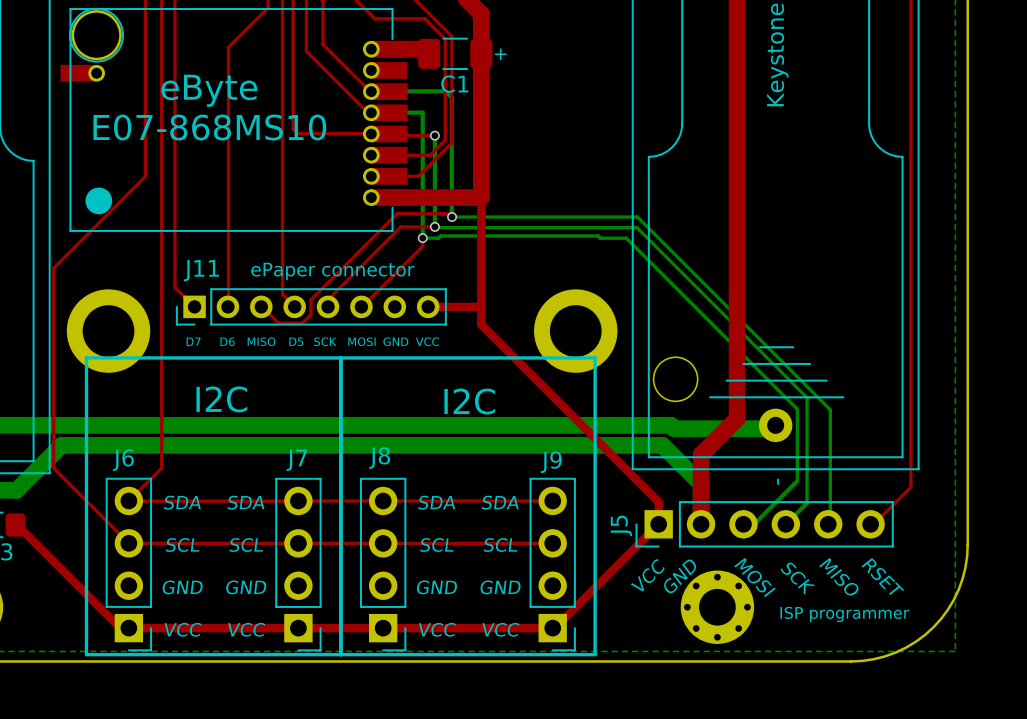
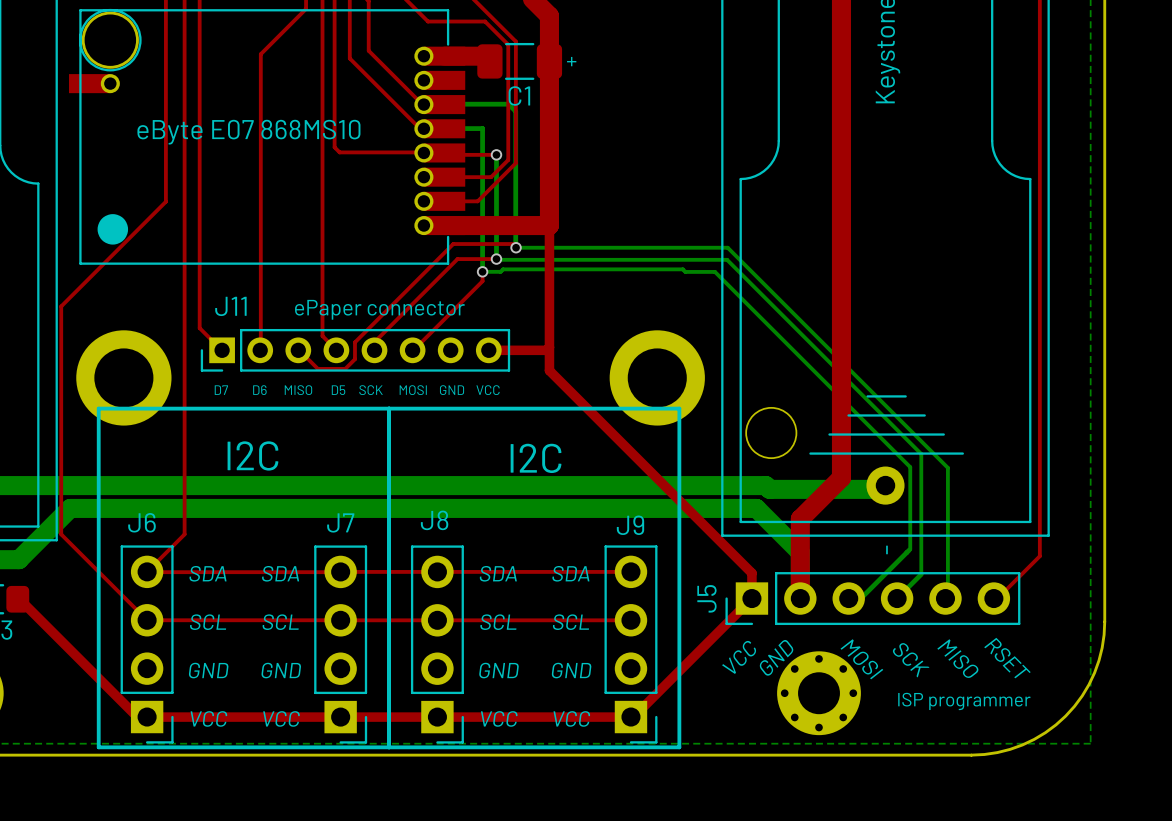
text: eByte (209, 90) -> none
part text: none -> eByte E07 868MS10 (248, 132)
text: E07-868MS10 (209, 127) -> none

